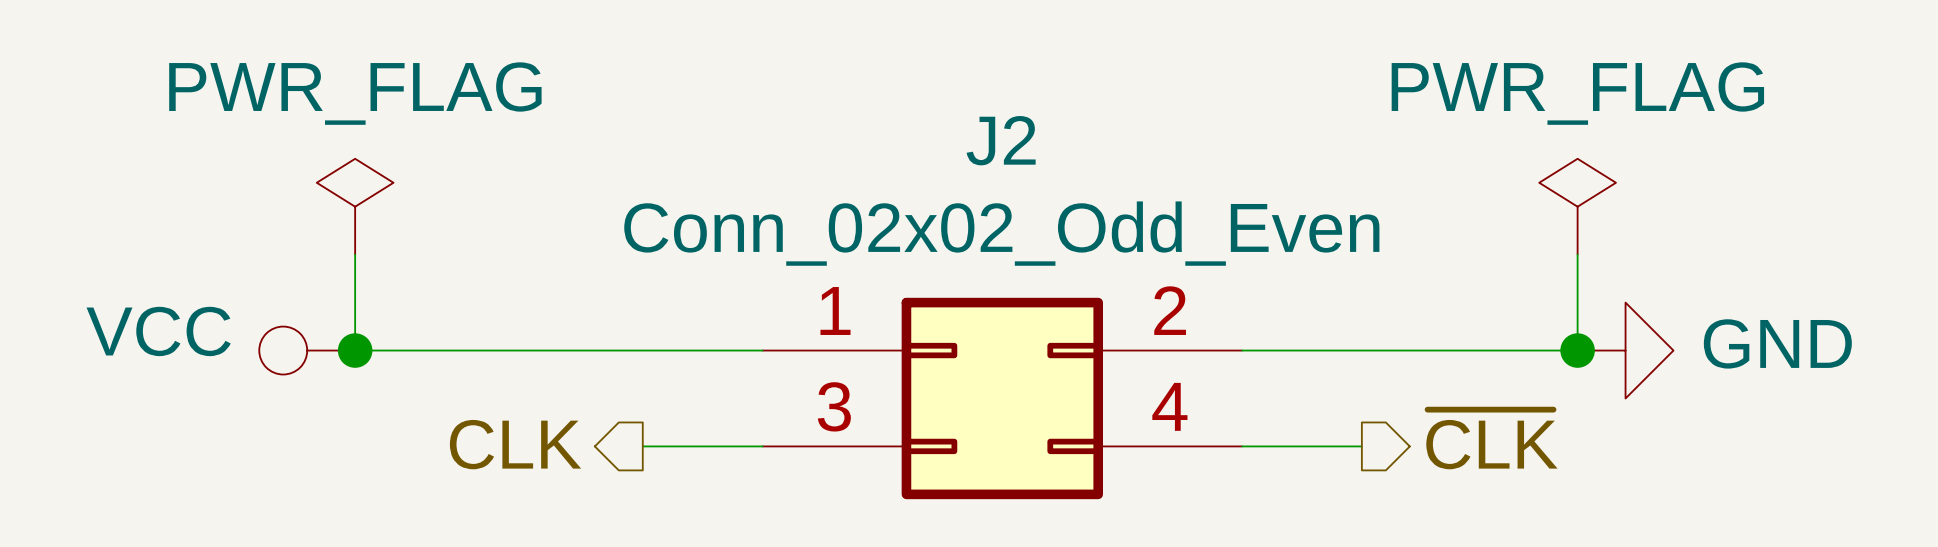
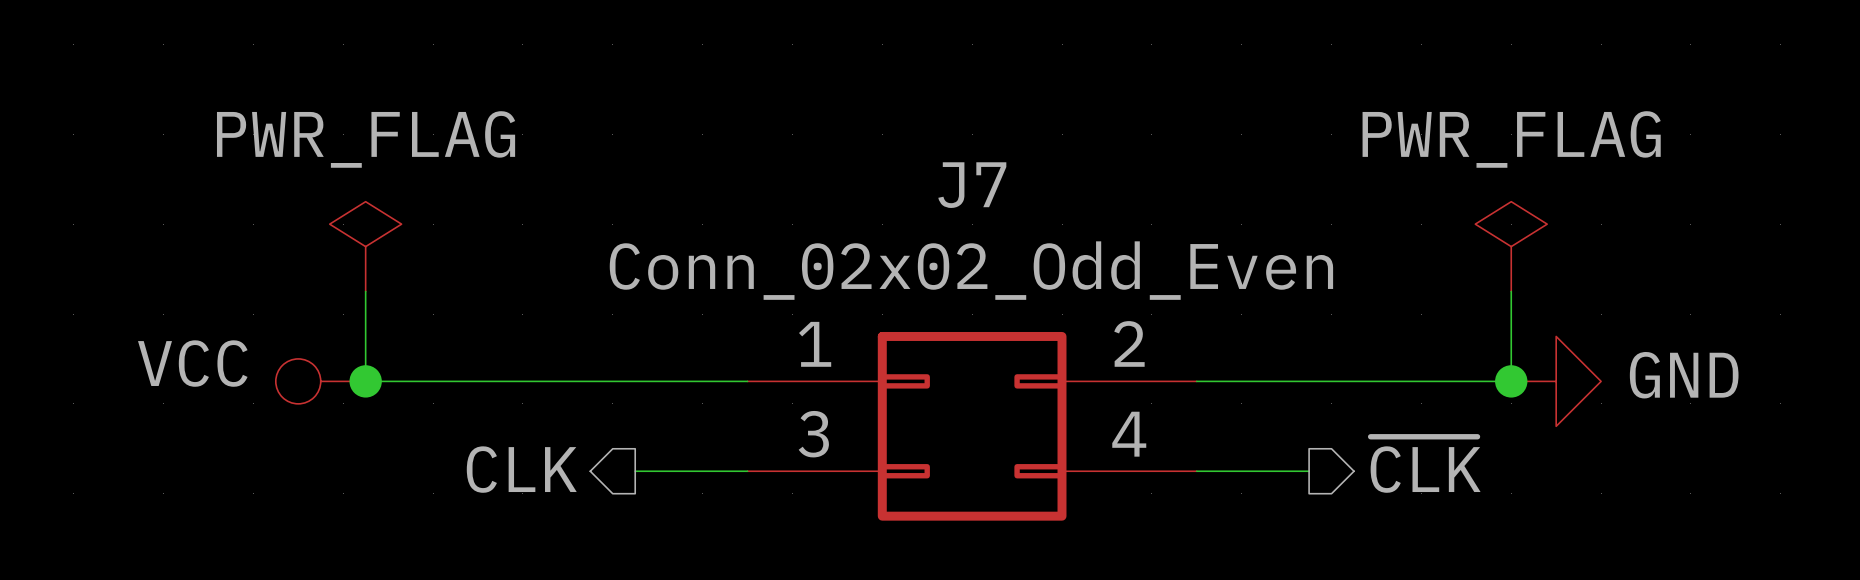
J2 name: J2 (1001, 140) -> J7 (972, 185)

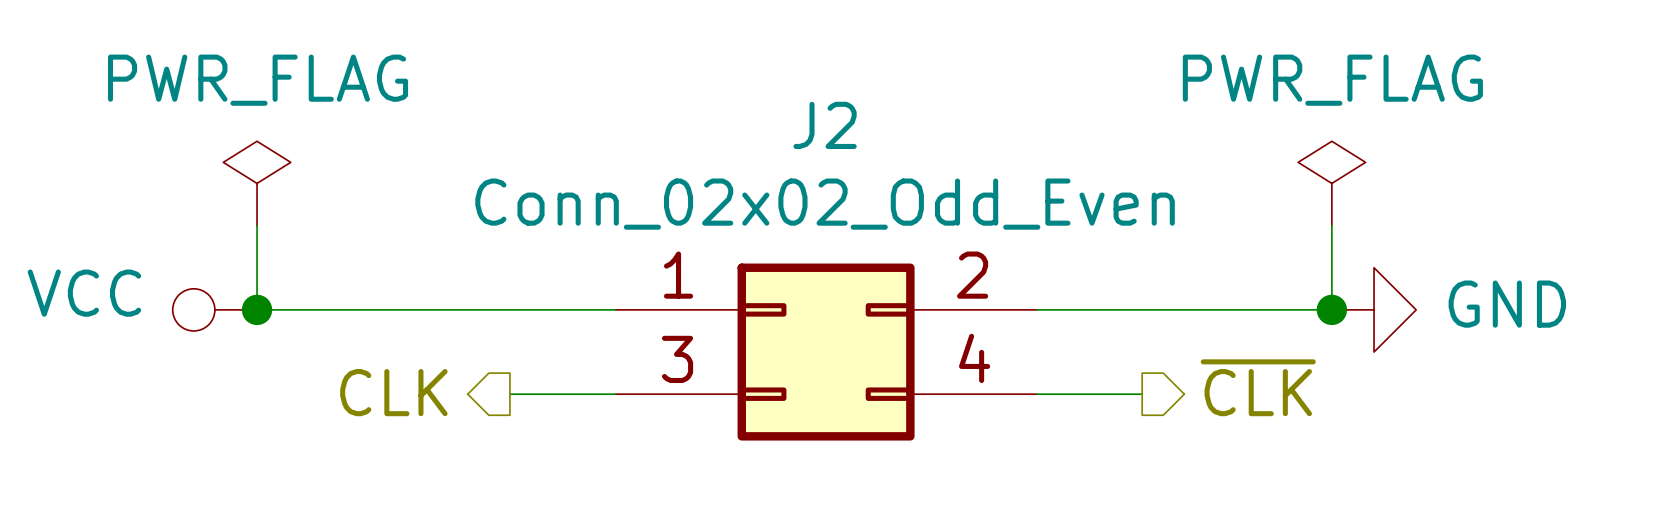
J7 name: J7 (972, 185) -> J2 (825, 125)

